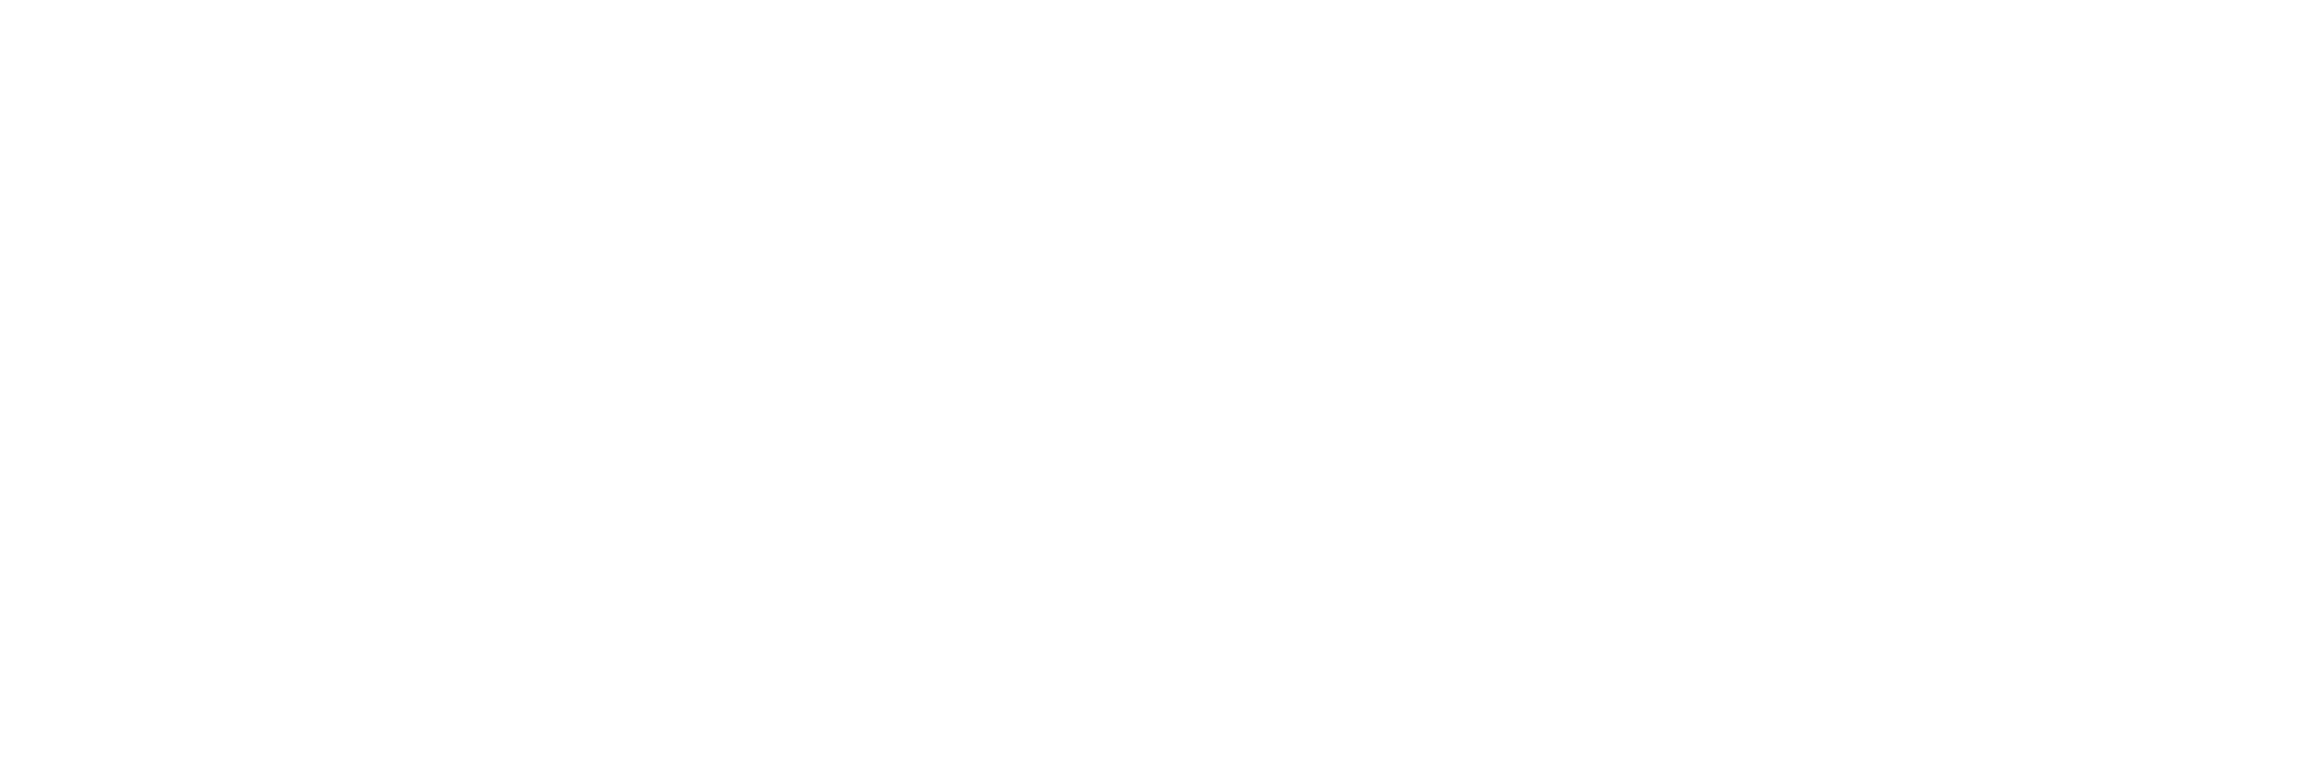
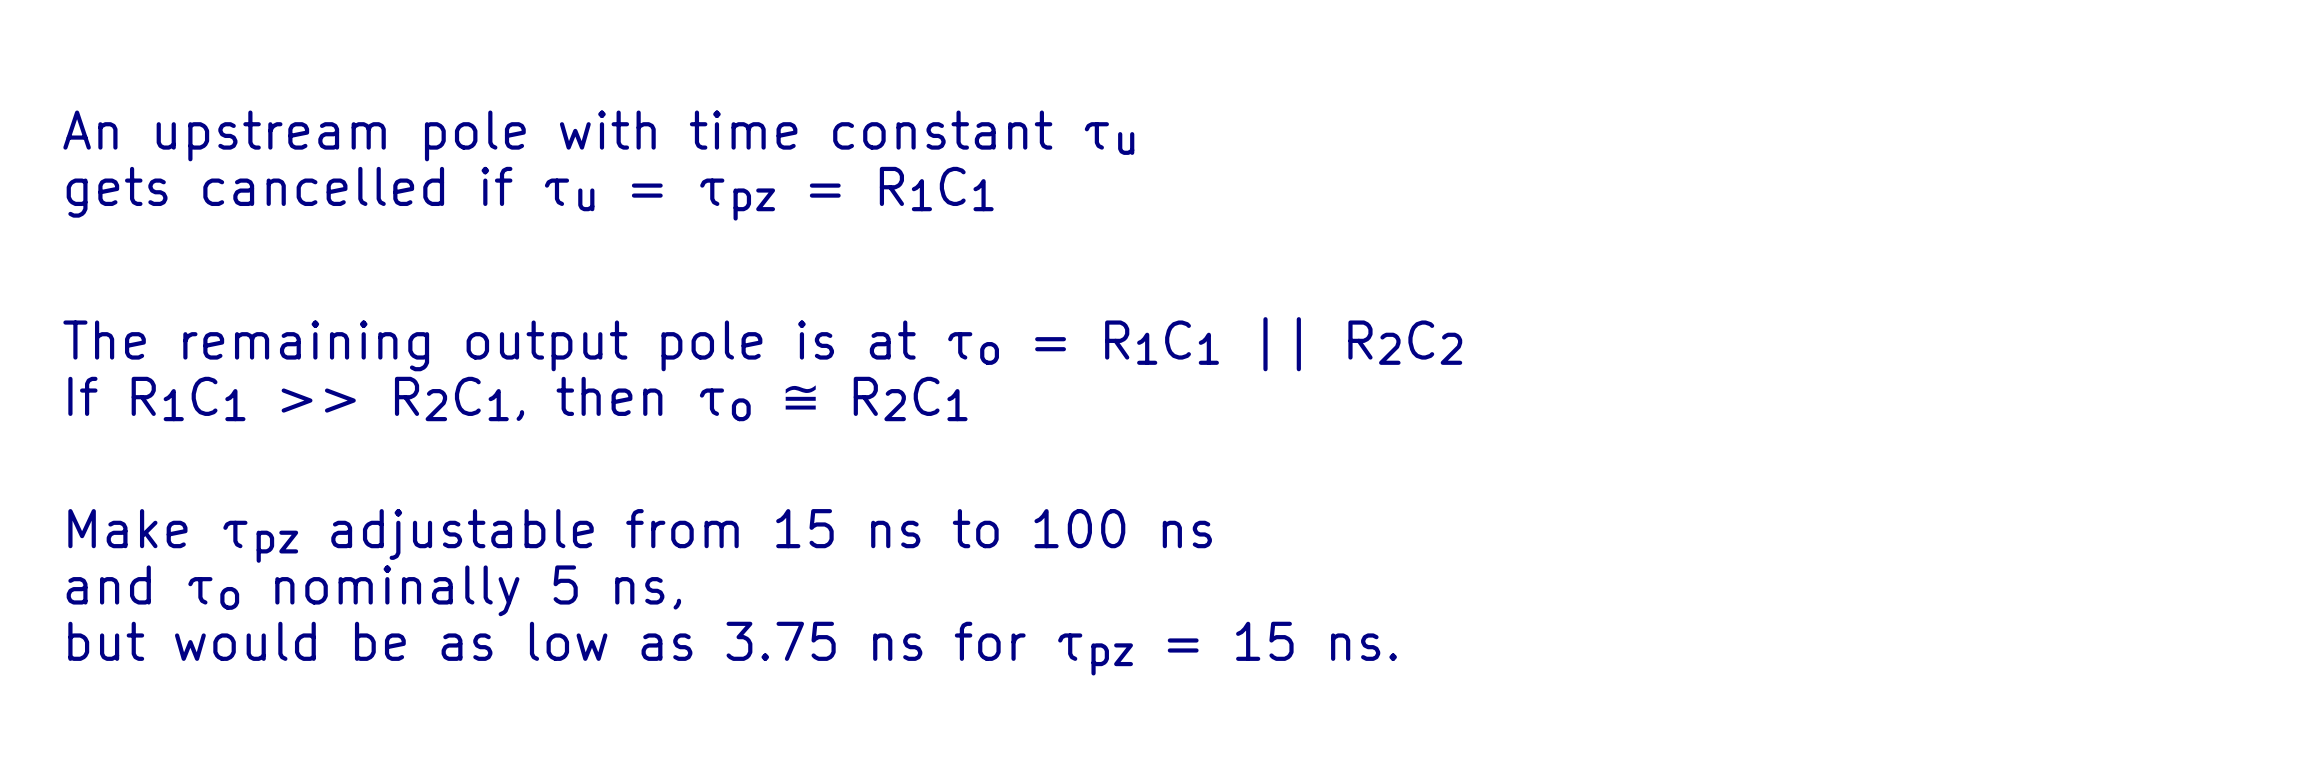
text: none -> An upstream pole with time constant τu (598, 135)
text: none -> gets cancelled if τu = τpz = R1C1 (530, 193)
text: none -> The remaining output pole is at τo = R1C1 || R2C2 (762, 344)
text: none -> If R1C1 >> R2C1, then τo ≅ R2C1 (517, 399)
text: none -> Make τpz adjustable from 15 ns to 100 ns (640, 535)
text: none -> and τo nominally 5 ns, (373, 590)
text: none -> but would be as low as 3.75 ns for τpz = 15 ns. (732, 648)

